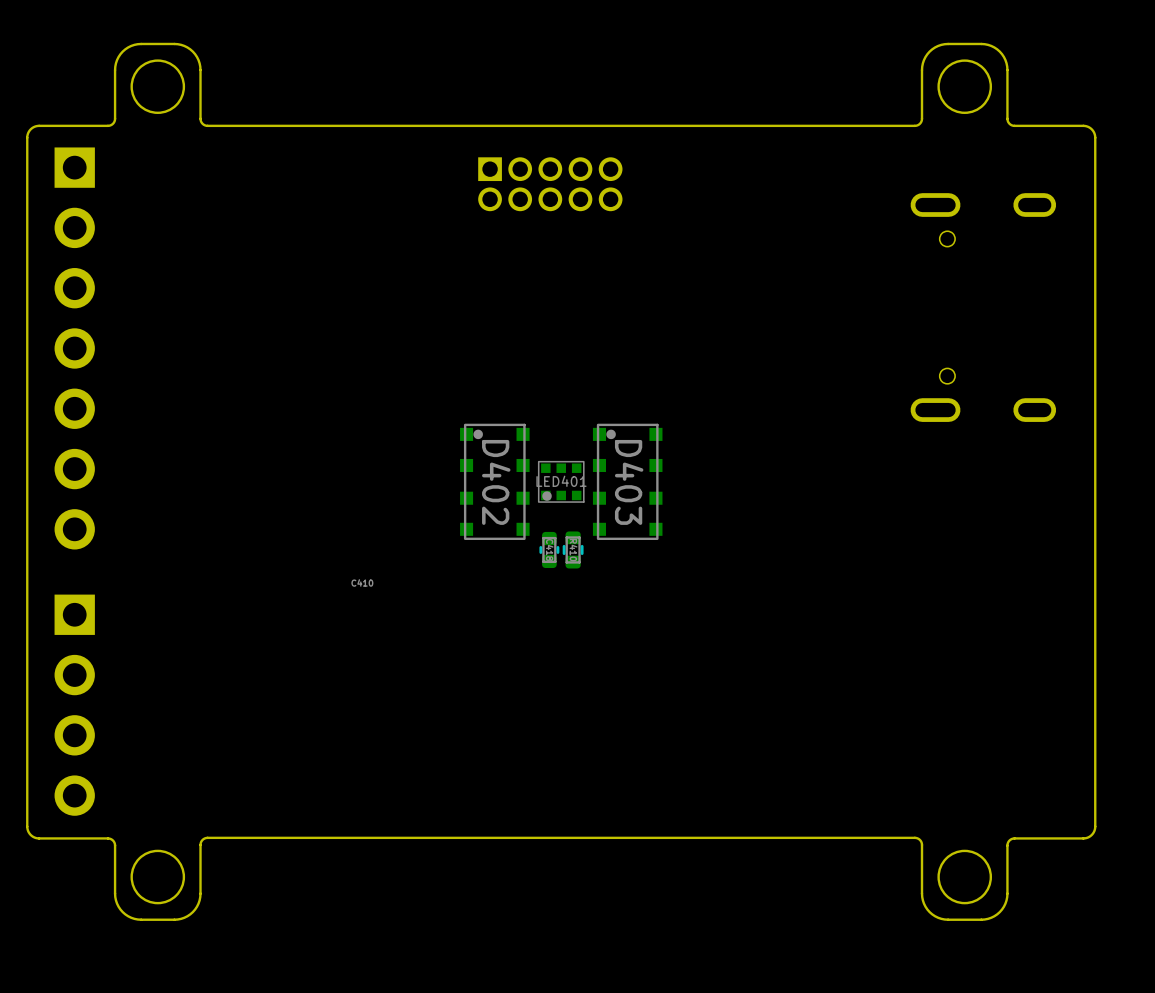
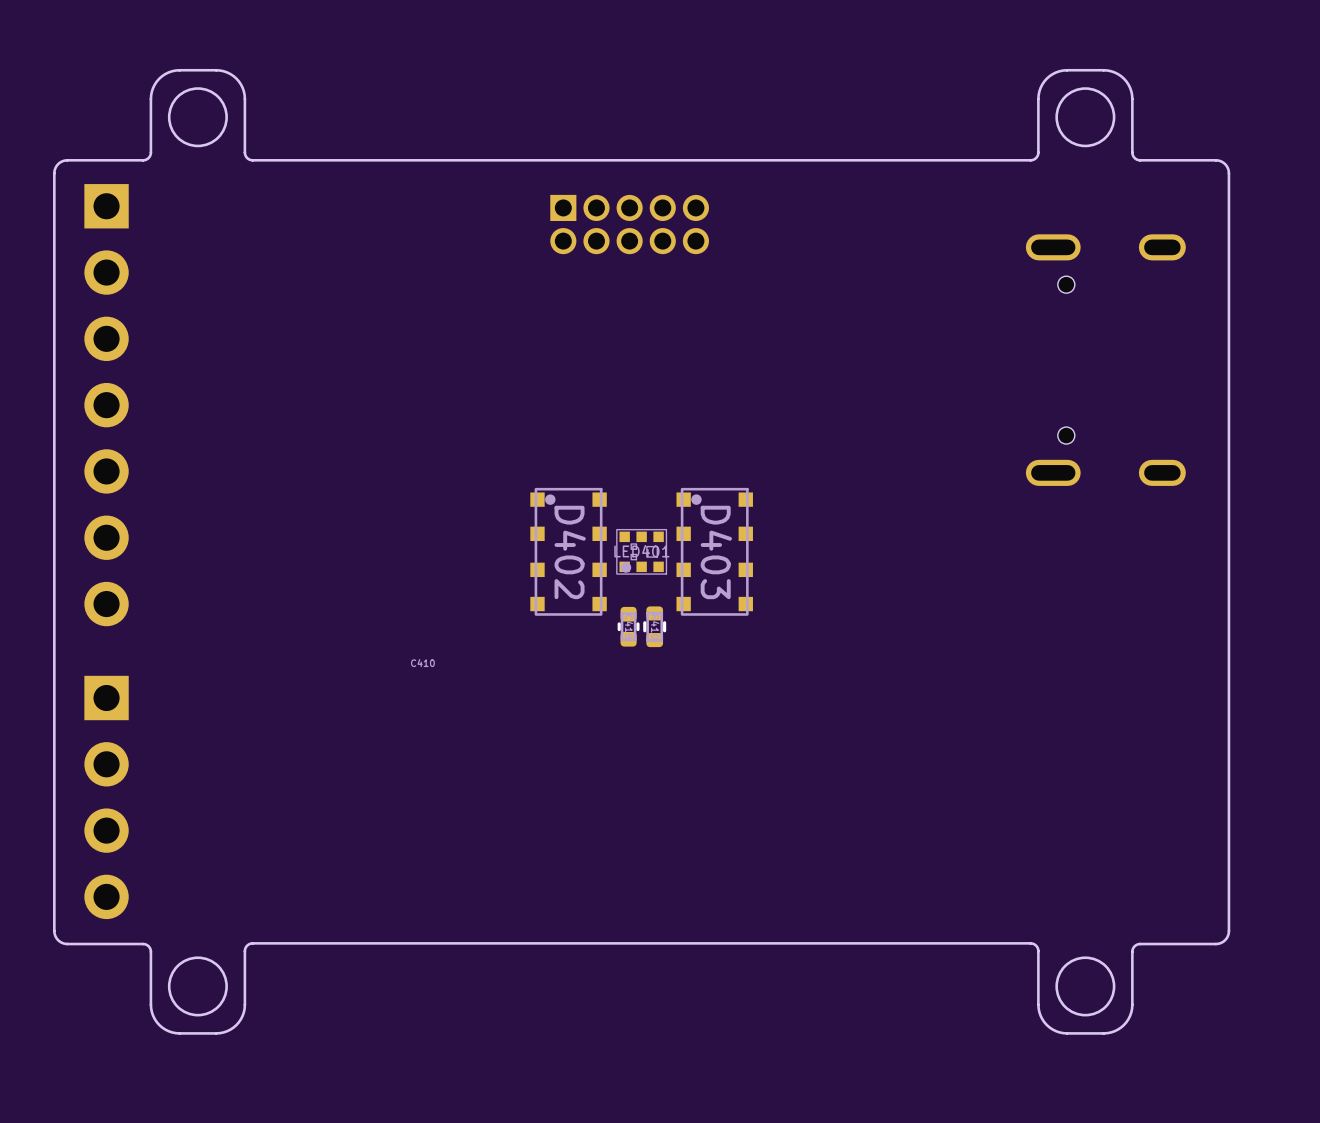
LED401 footprint: [538, 461, 585, 503] -> [616, 529, 668, 575]

